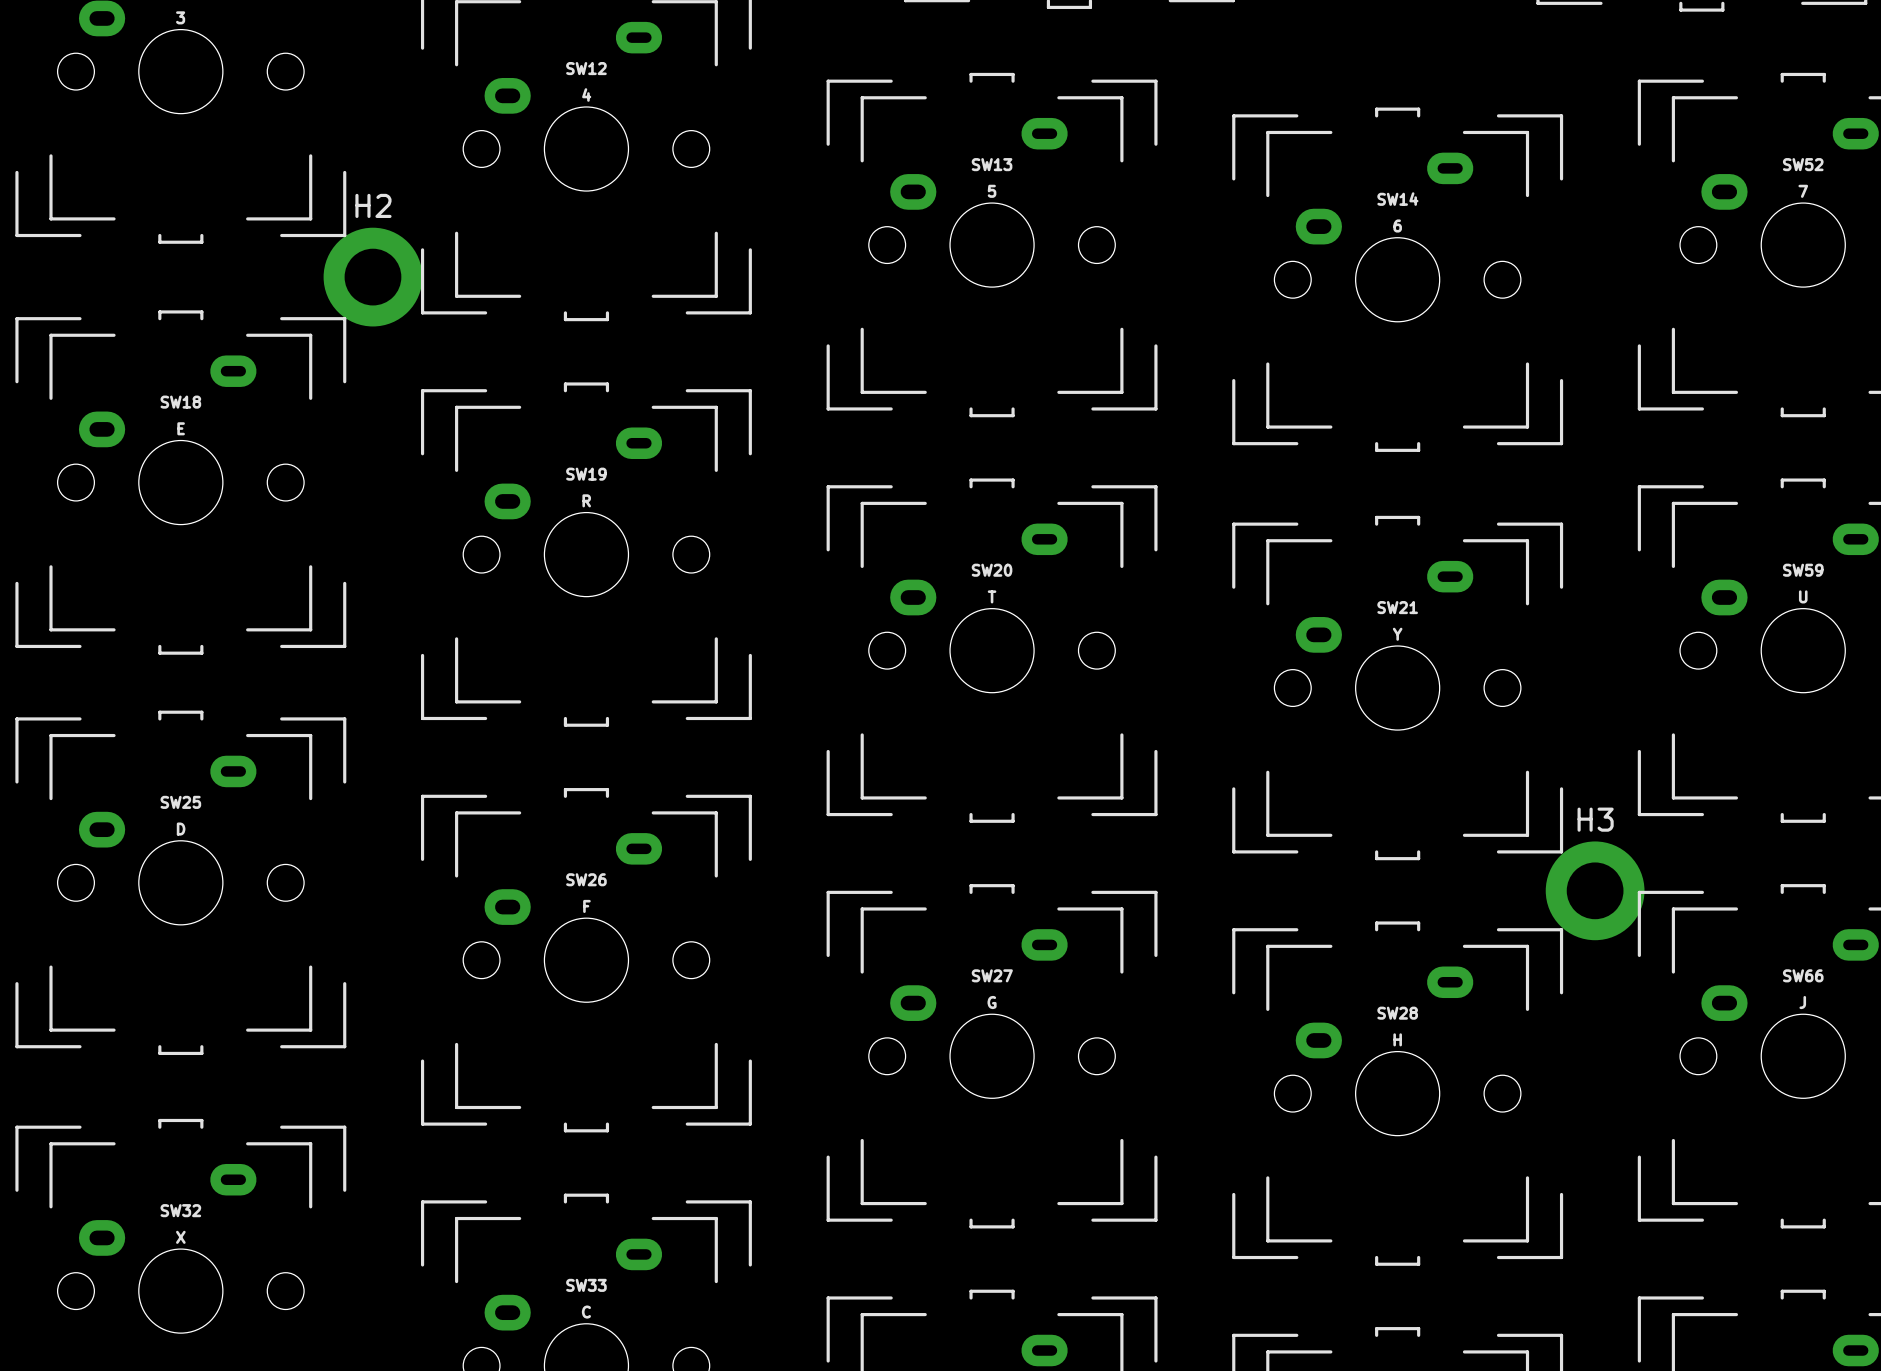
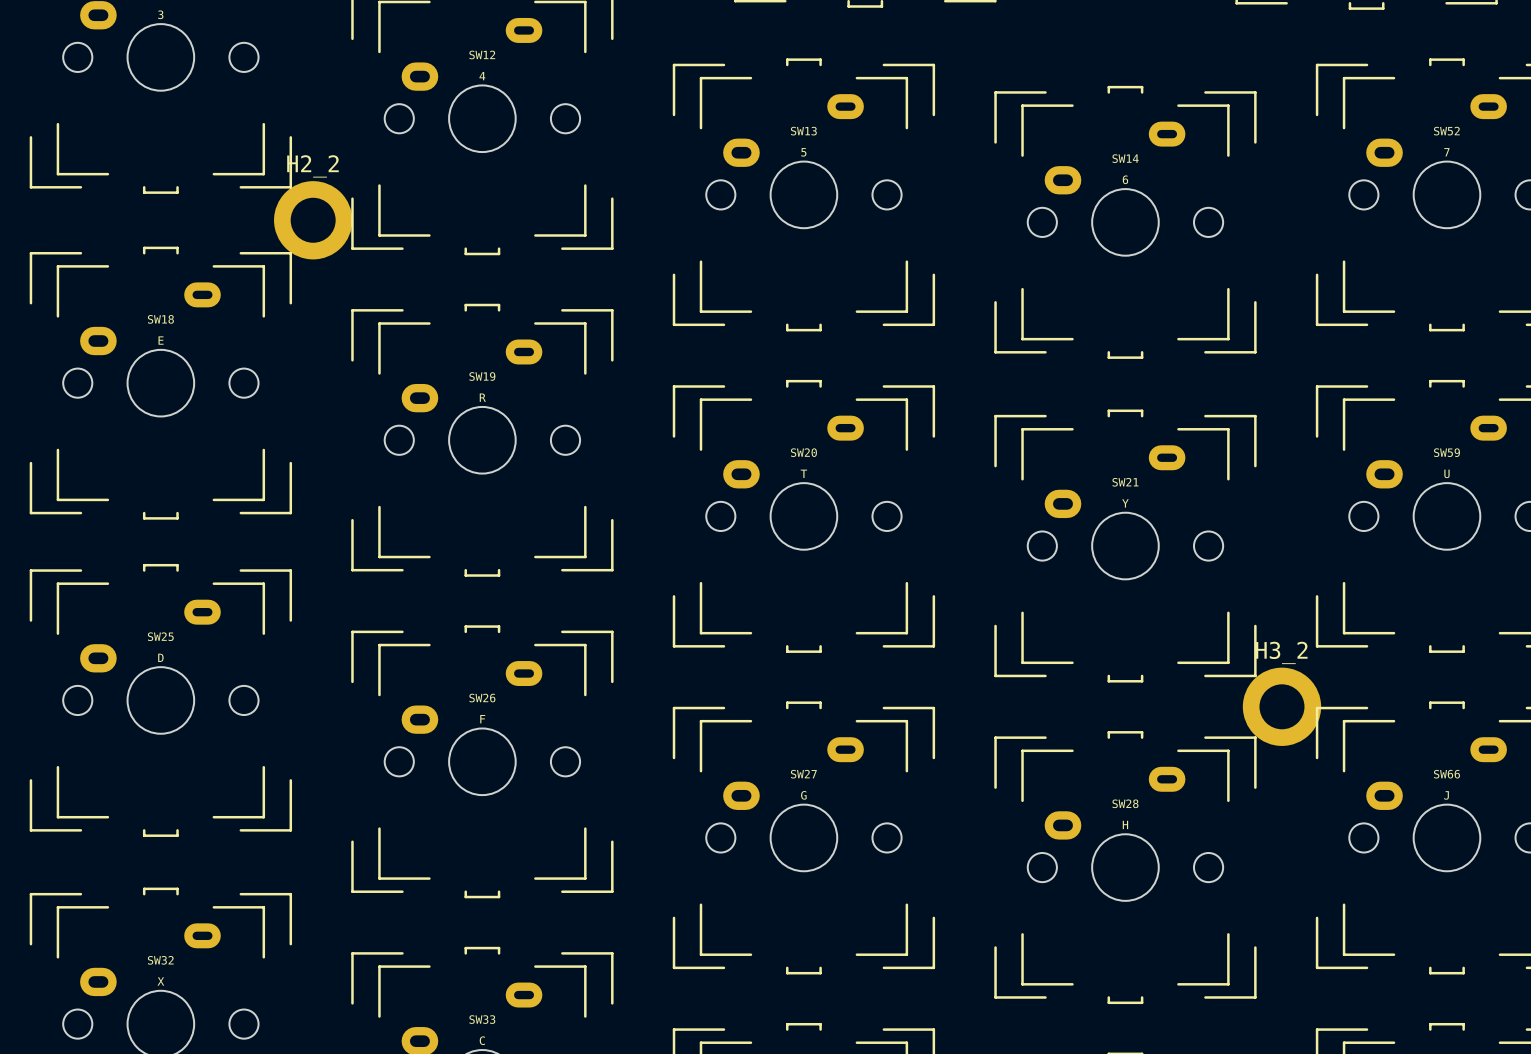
H2 name: H2 (373, 205) -> H2_2 (312, 166)
H3 name: H3 (1595, 819) -> H3_2 (1281, 652)

